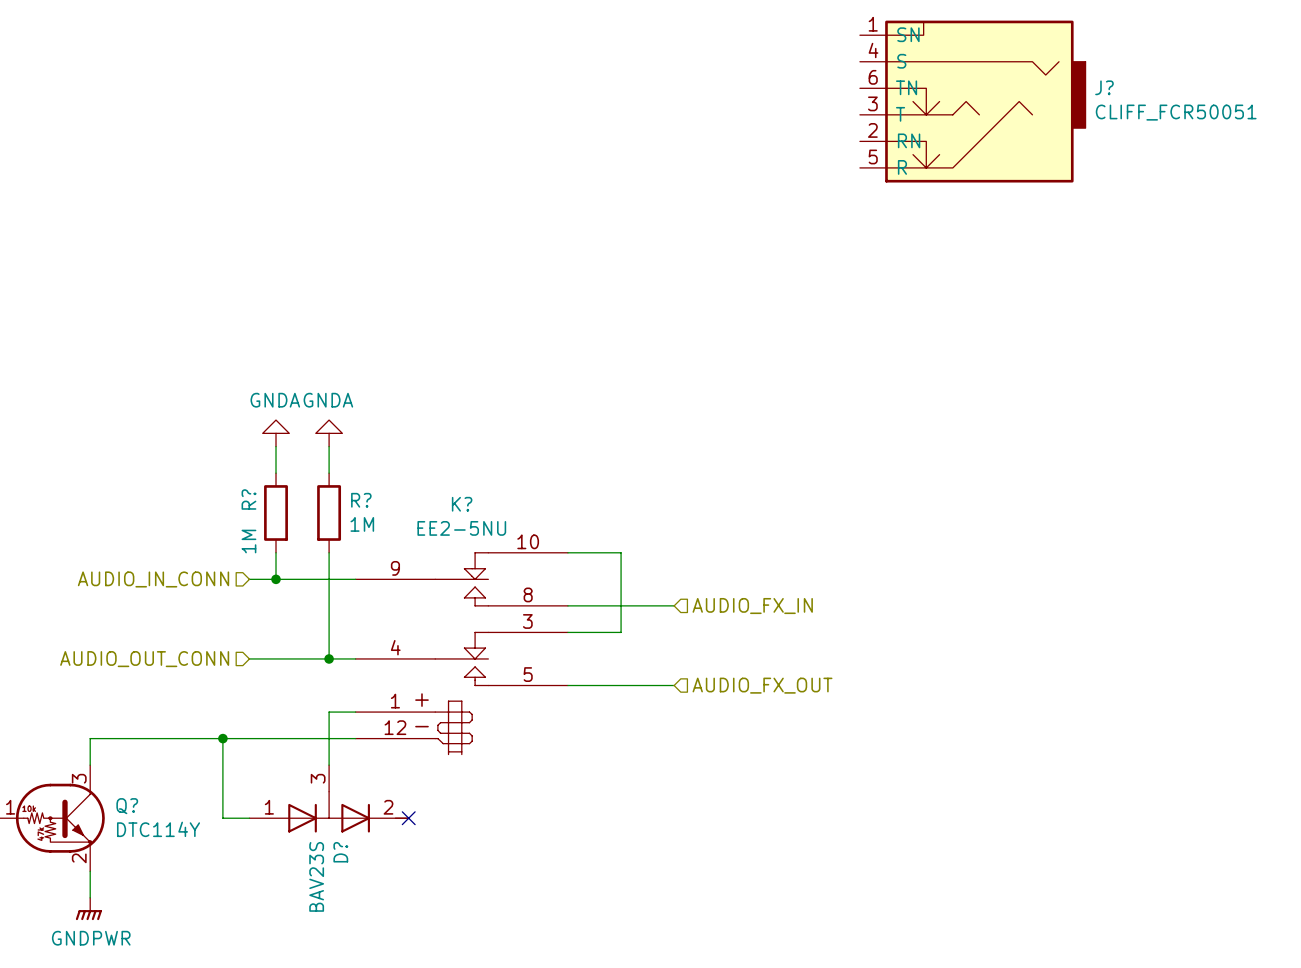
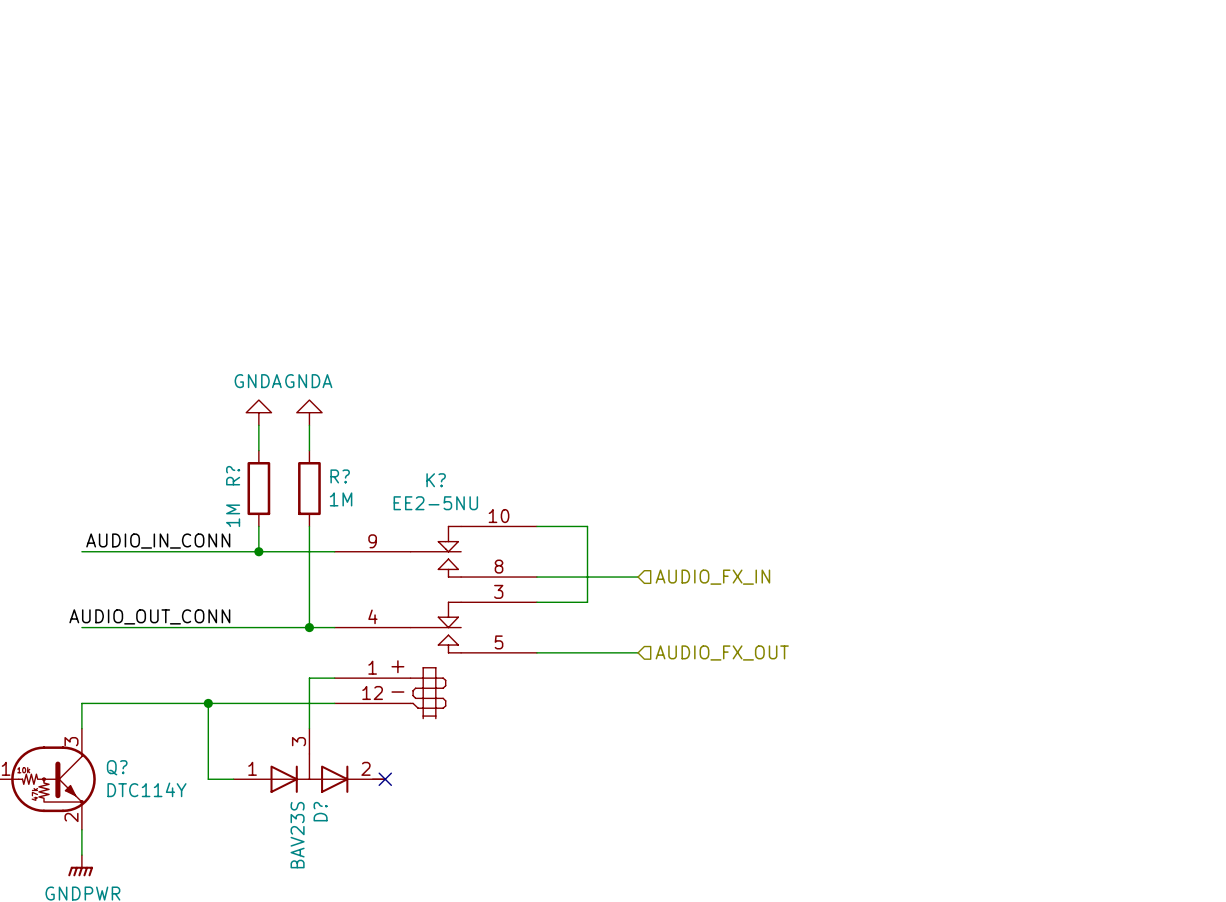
J?: CLIFF_FCR50051 (972, 101) -> none
label: none -> AUDIO_IN_CONN (158, 541)
wire: none -> (81, 551) (233, 551)
hierarchical label: AUDIO_IN_CONN (153, 579) -> none
label: none -> AUDIO_OUT_CONN (149, 616)
wire: none -> (81, 627) (233, 627)
hierarchical label: AUDIO_OUT_CONN (144, 659) -> none

